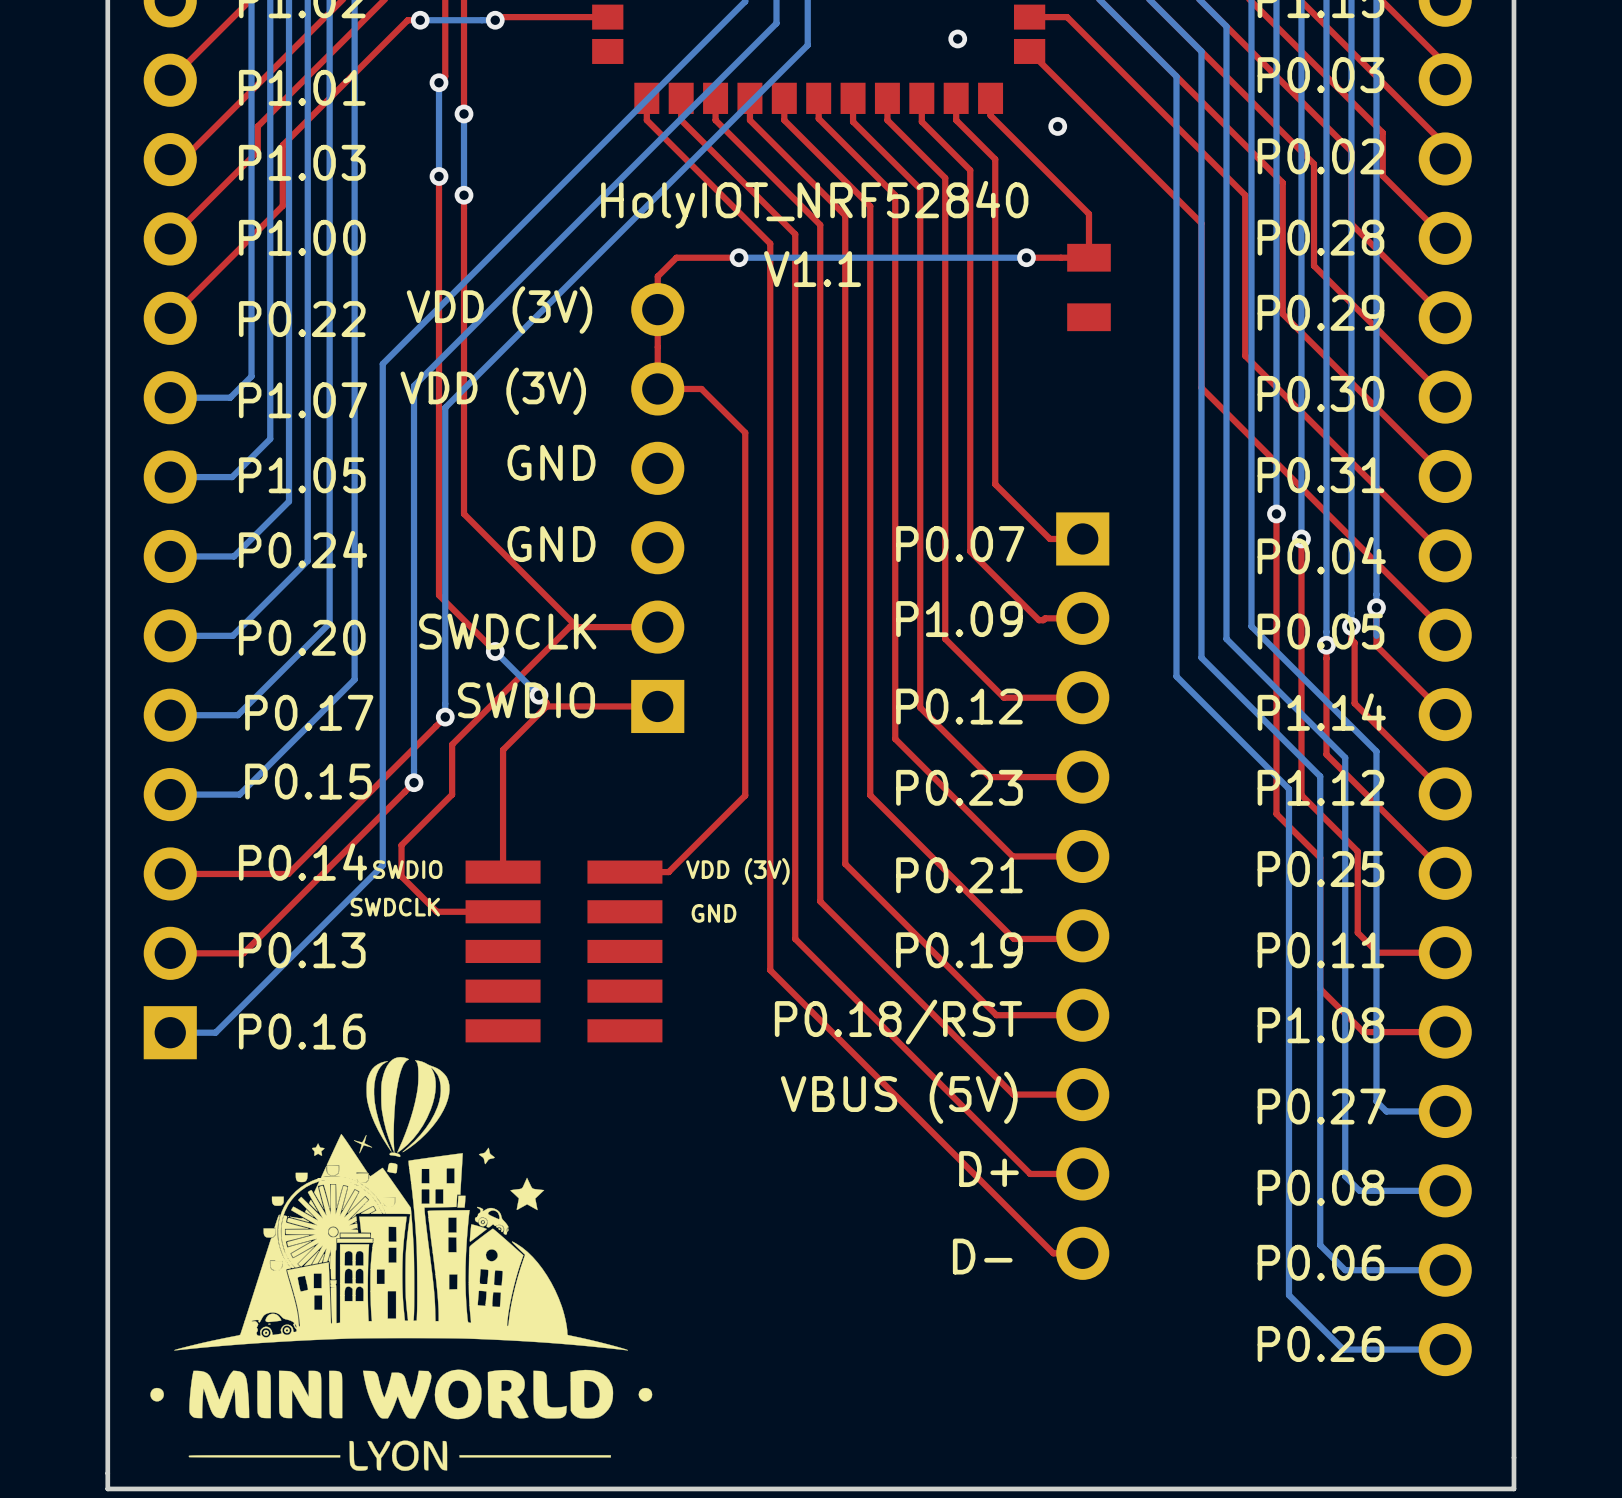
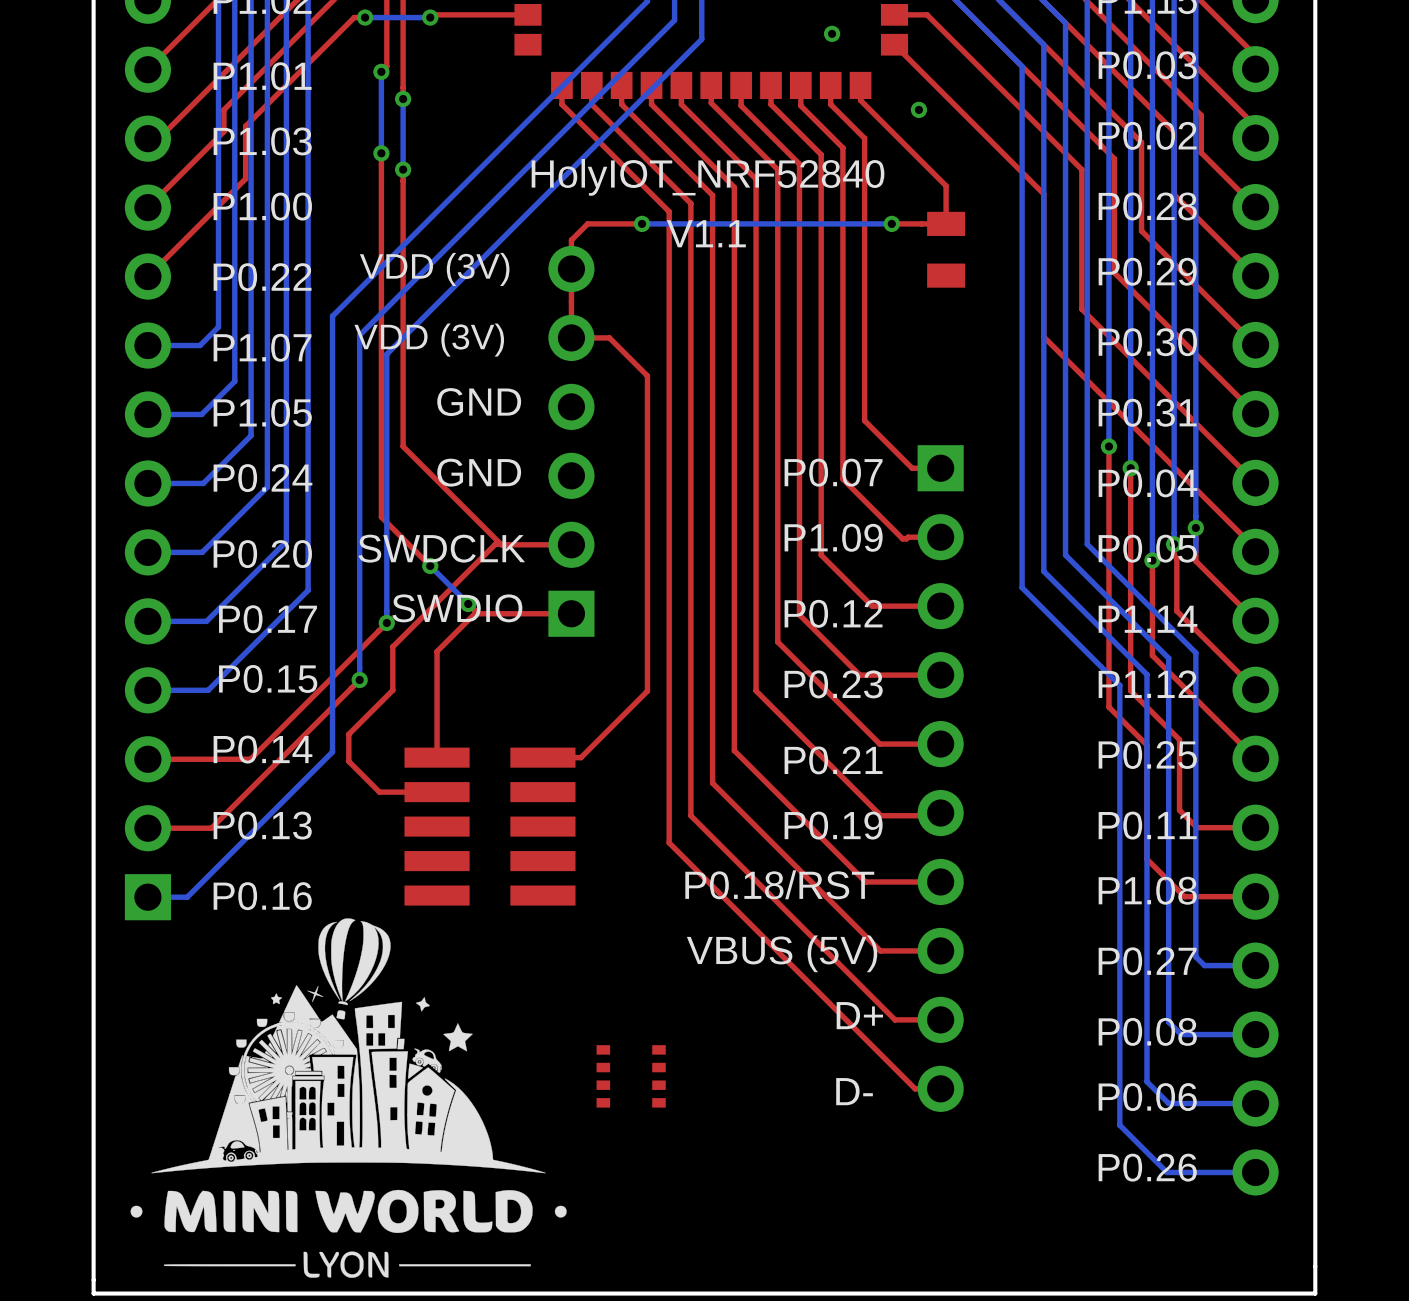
text: SWDIO (407, 869) -> none
text: VDD (3V) (737, 871) -> none
text: SWDCLK (395, 907) -> none
text: GND (714, 913) -> none
part: none -> (631, 1076)

